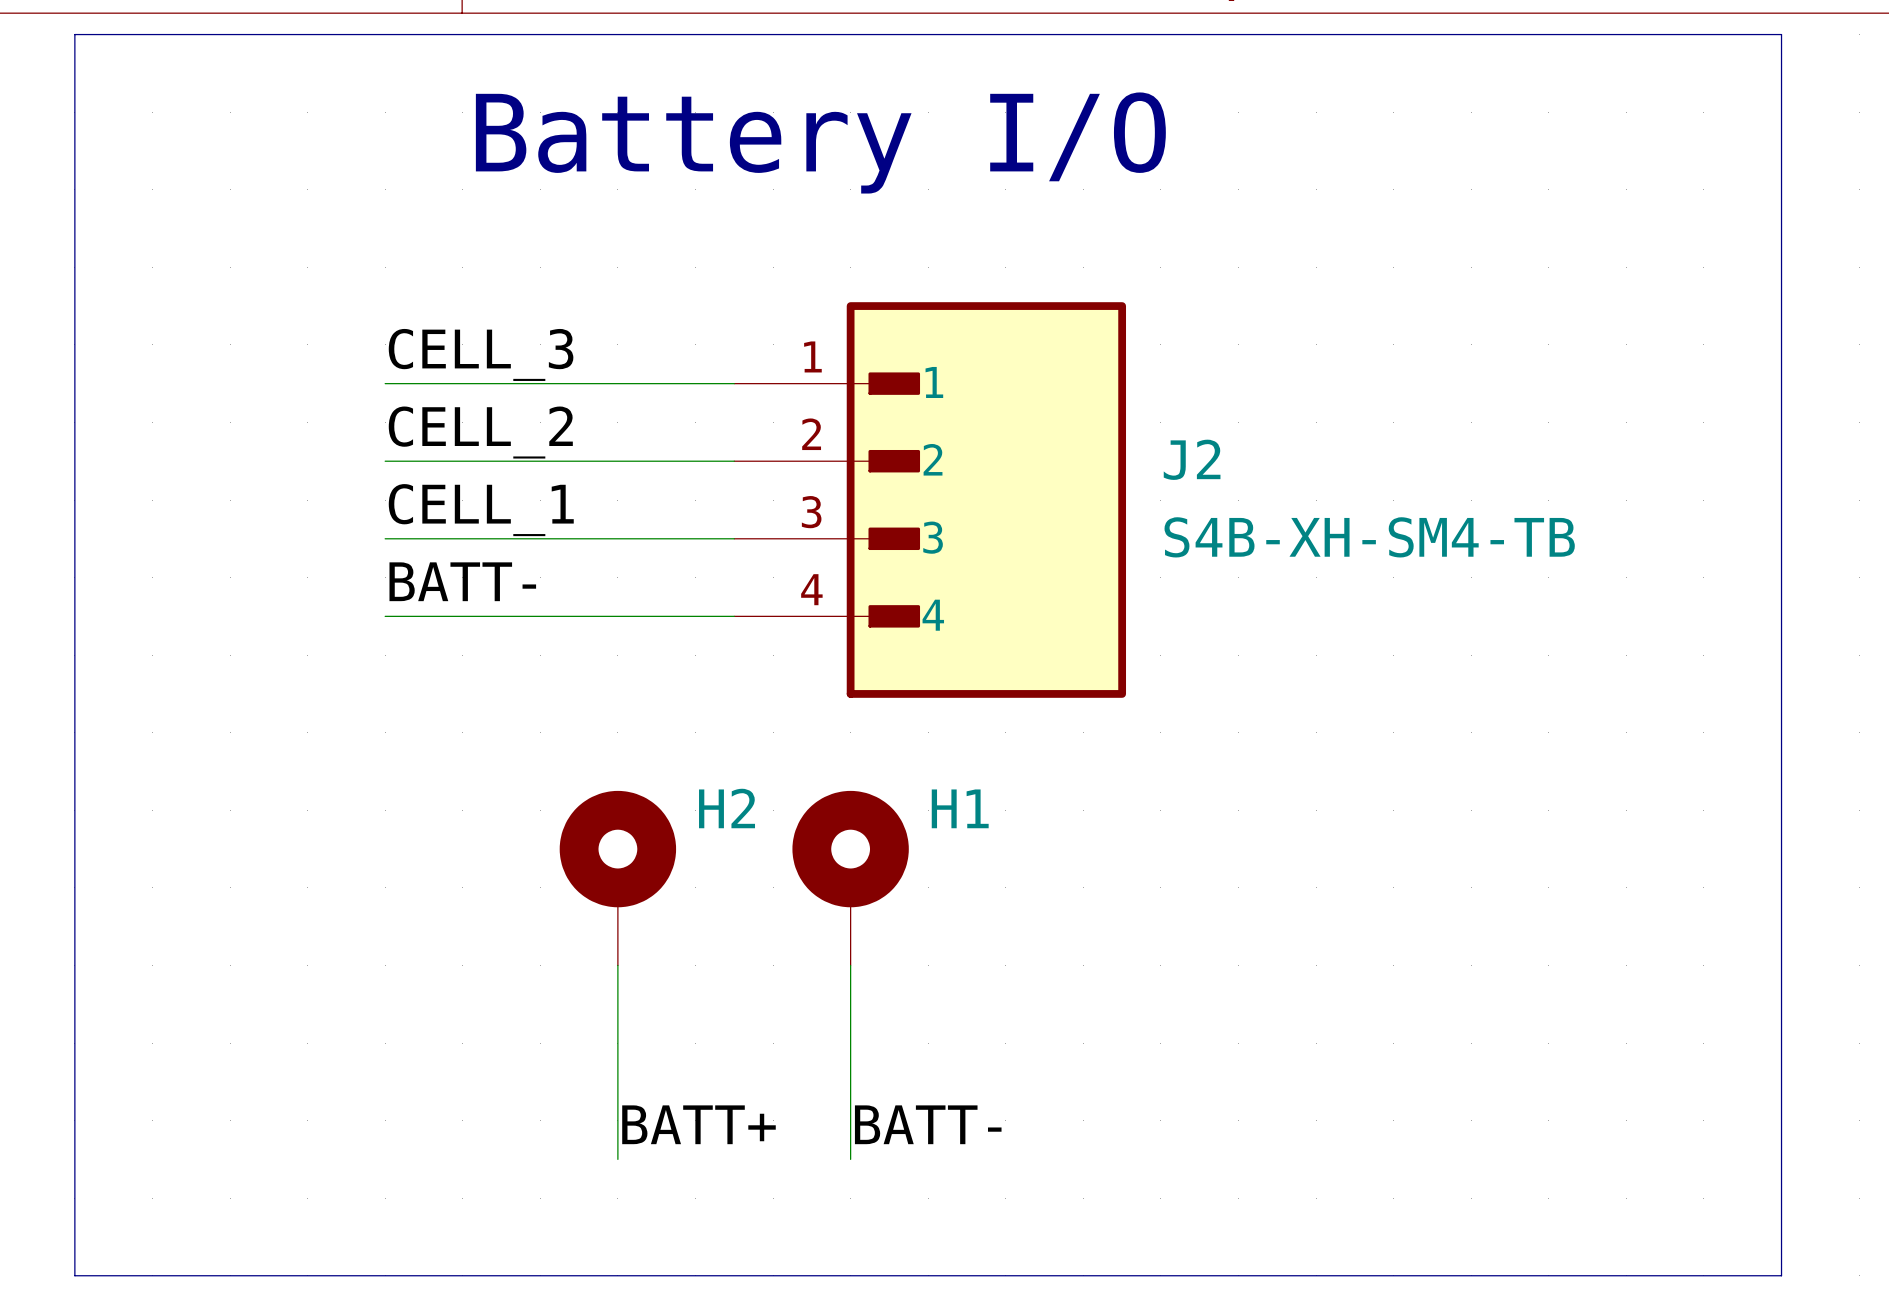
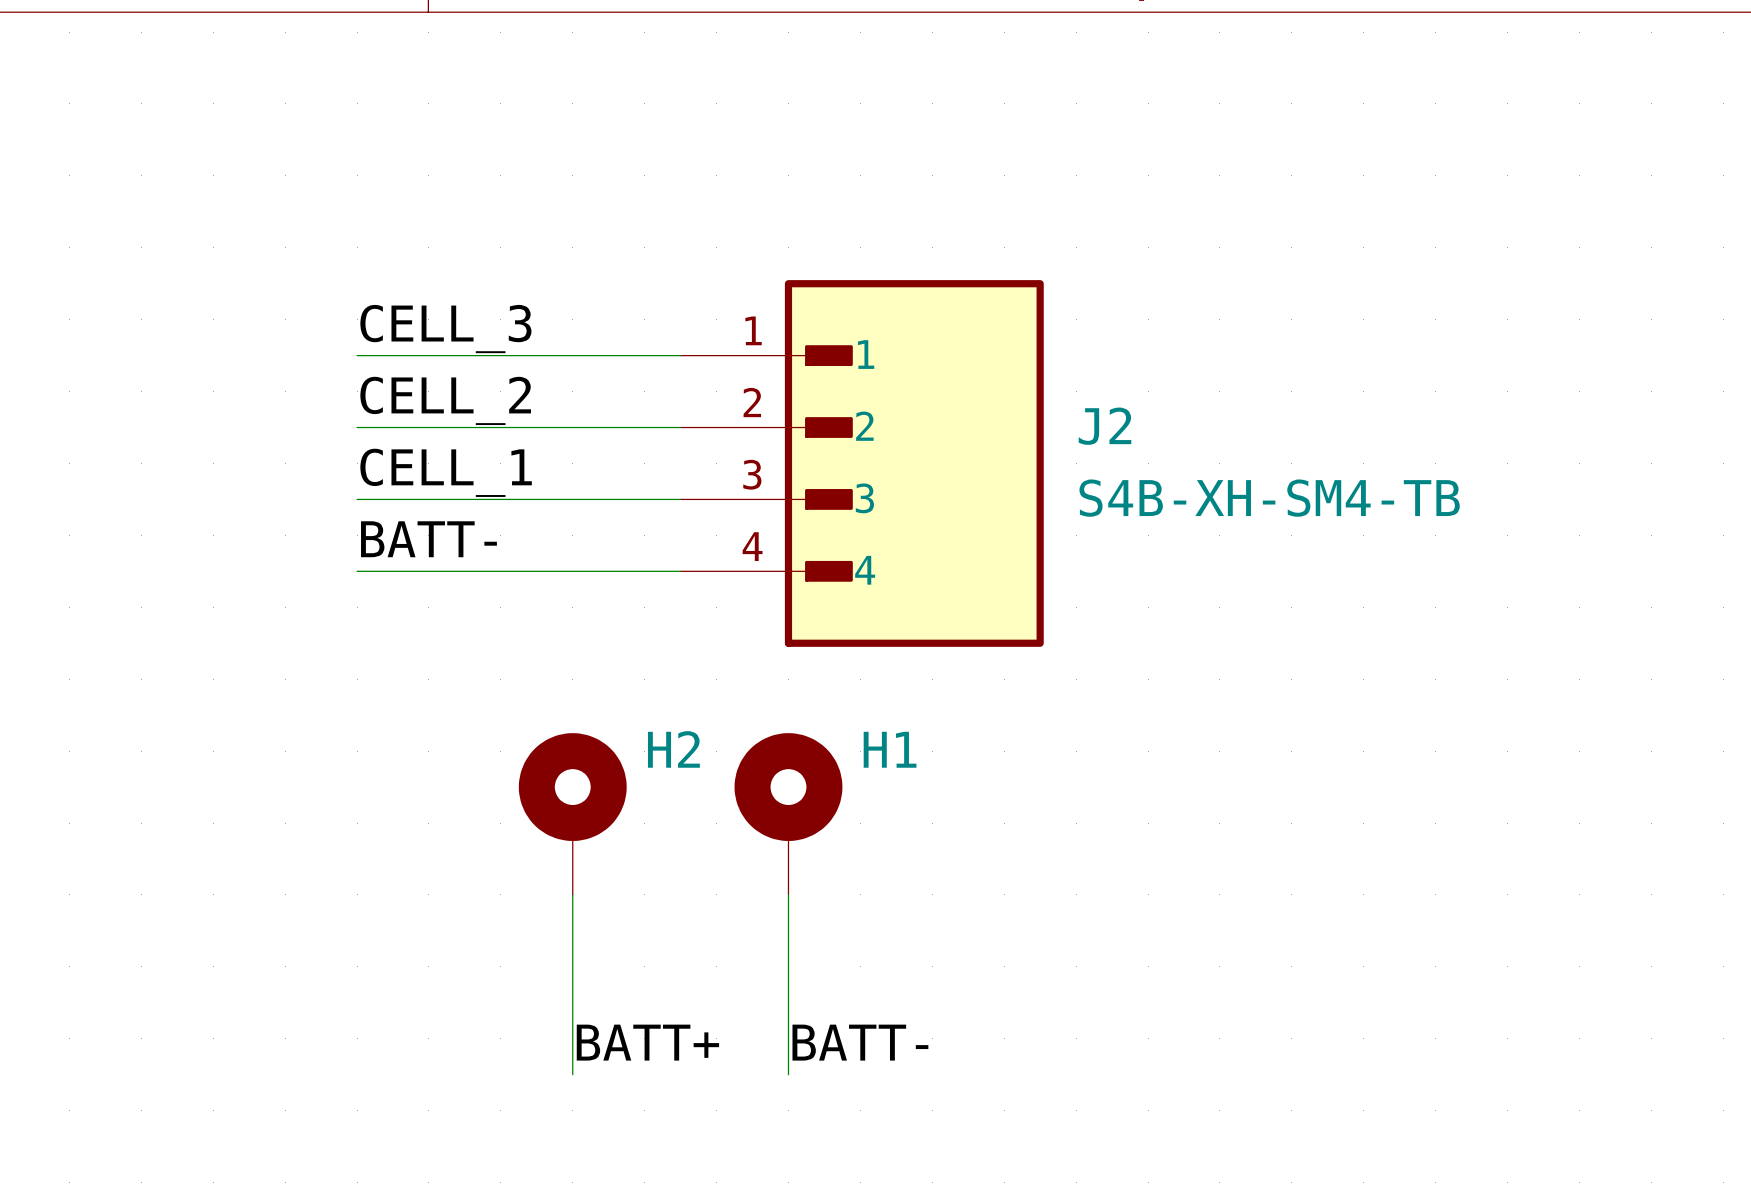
line: (74, 34) (1781, 34) (1781, 1275) (74, 1275) (74, 34) -> none
text: Battery I/O (820, 142) -> none

